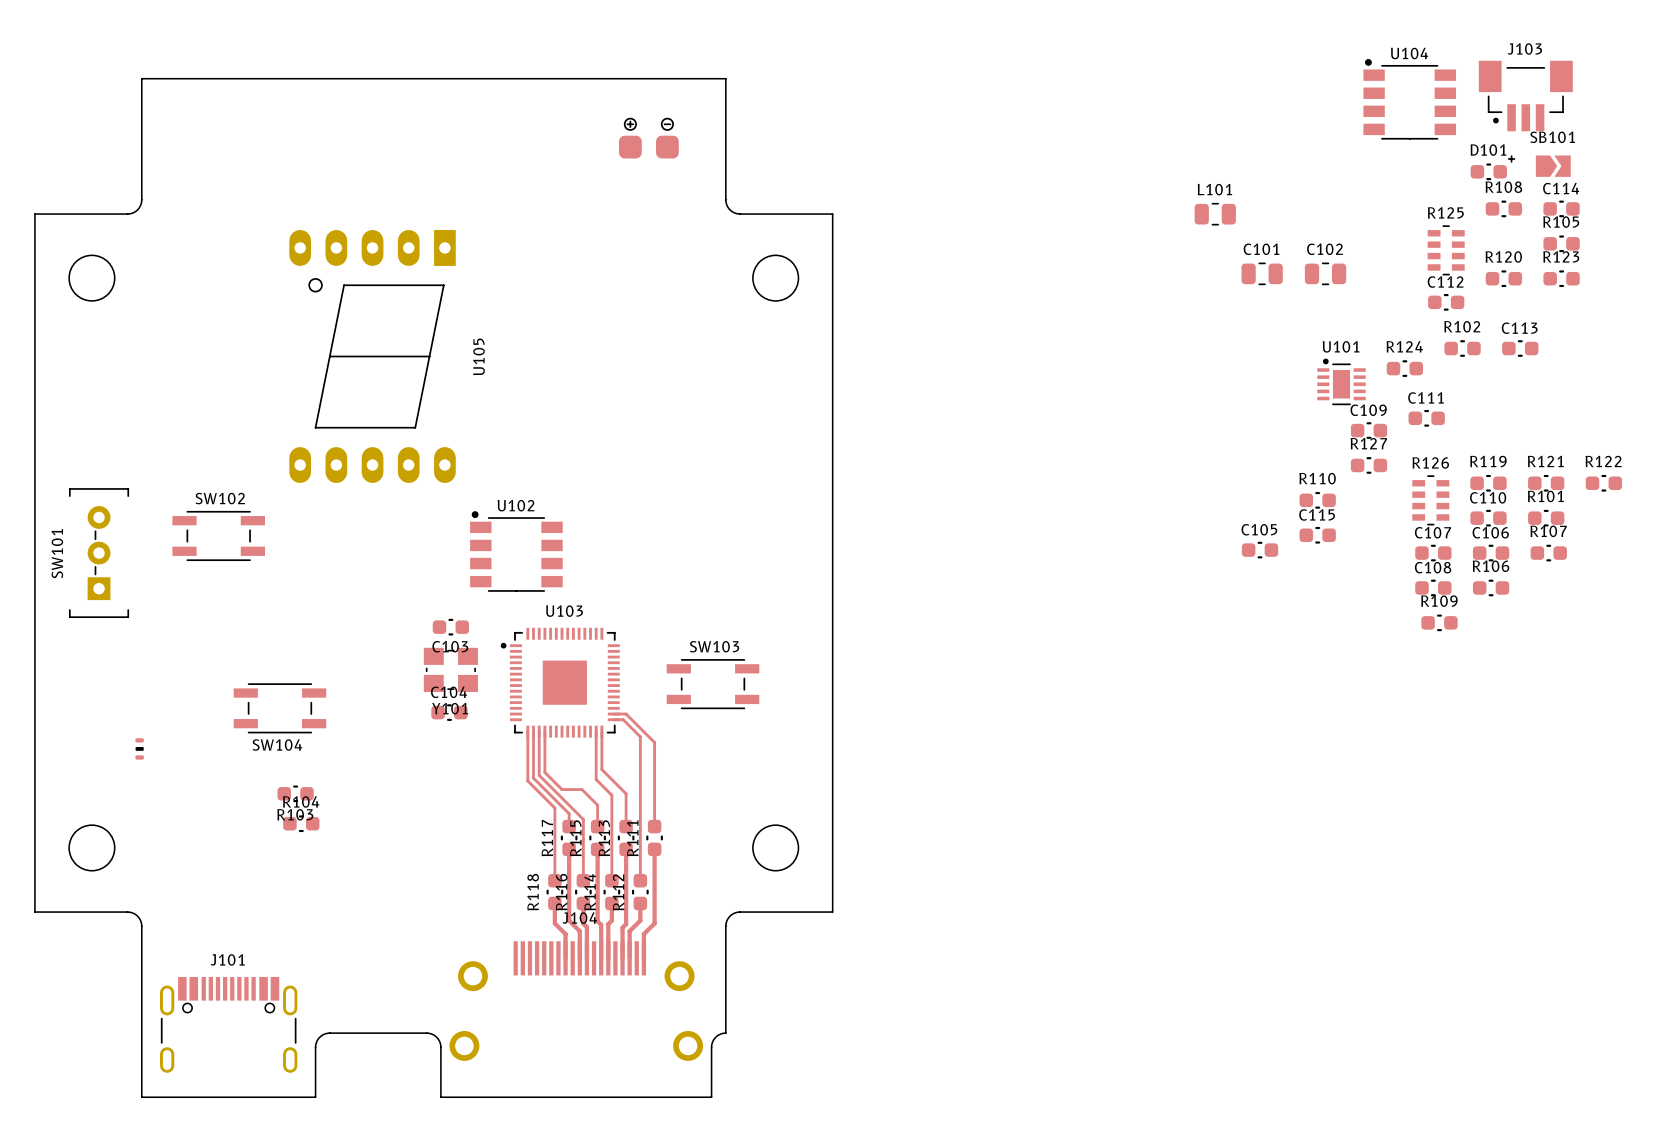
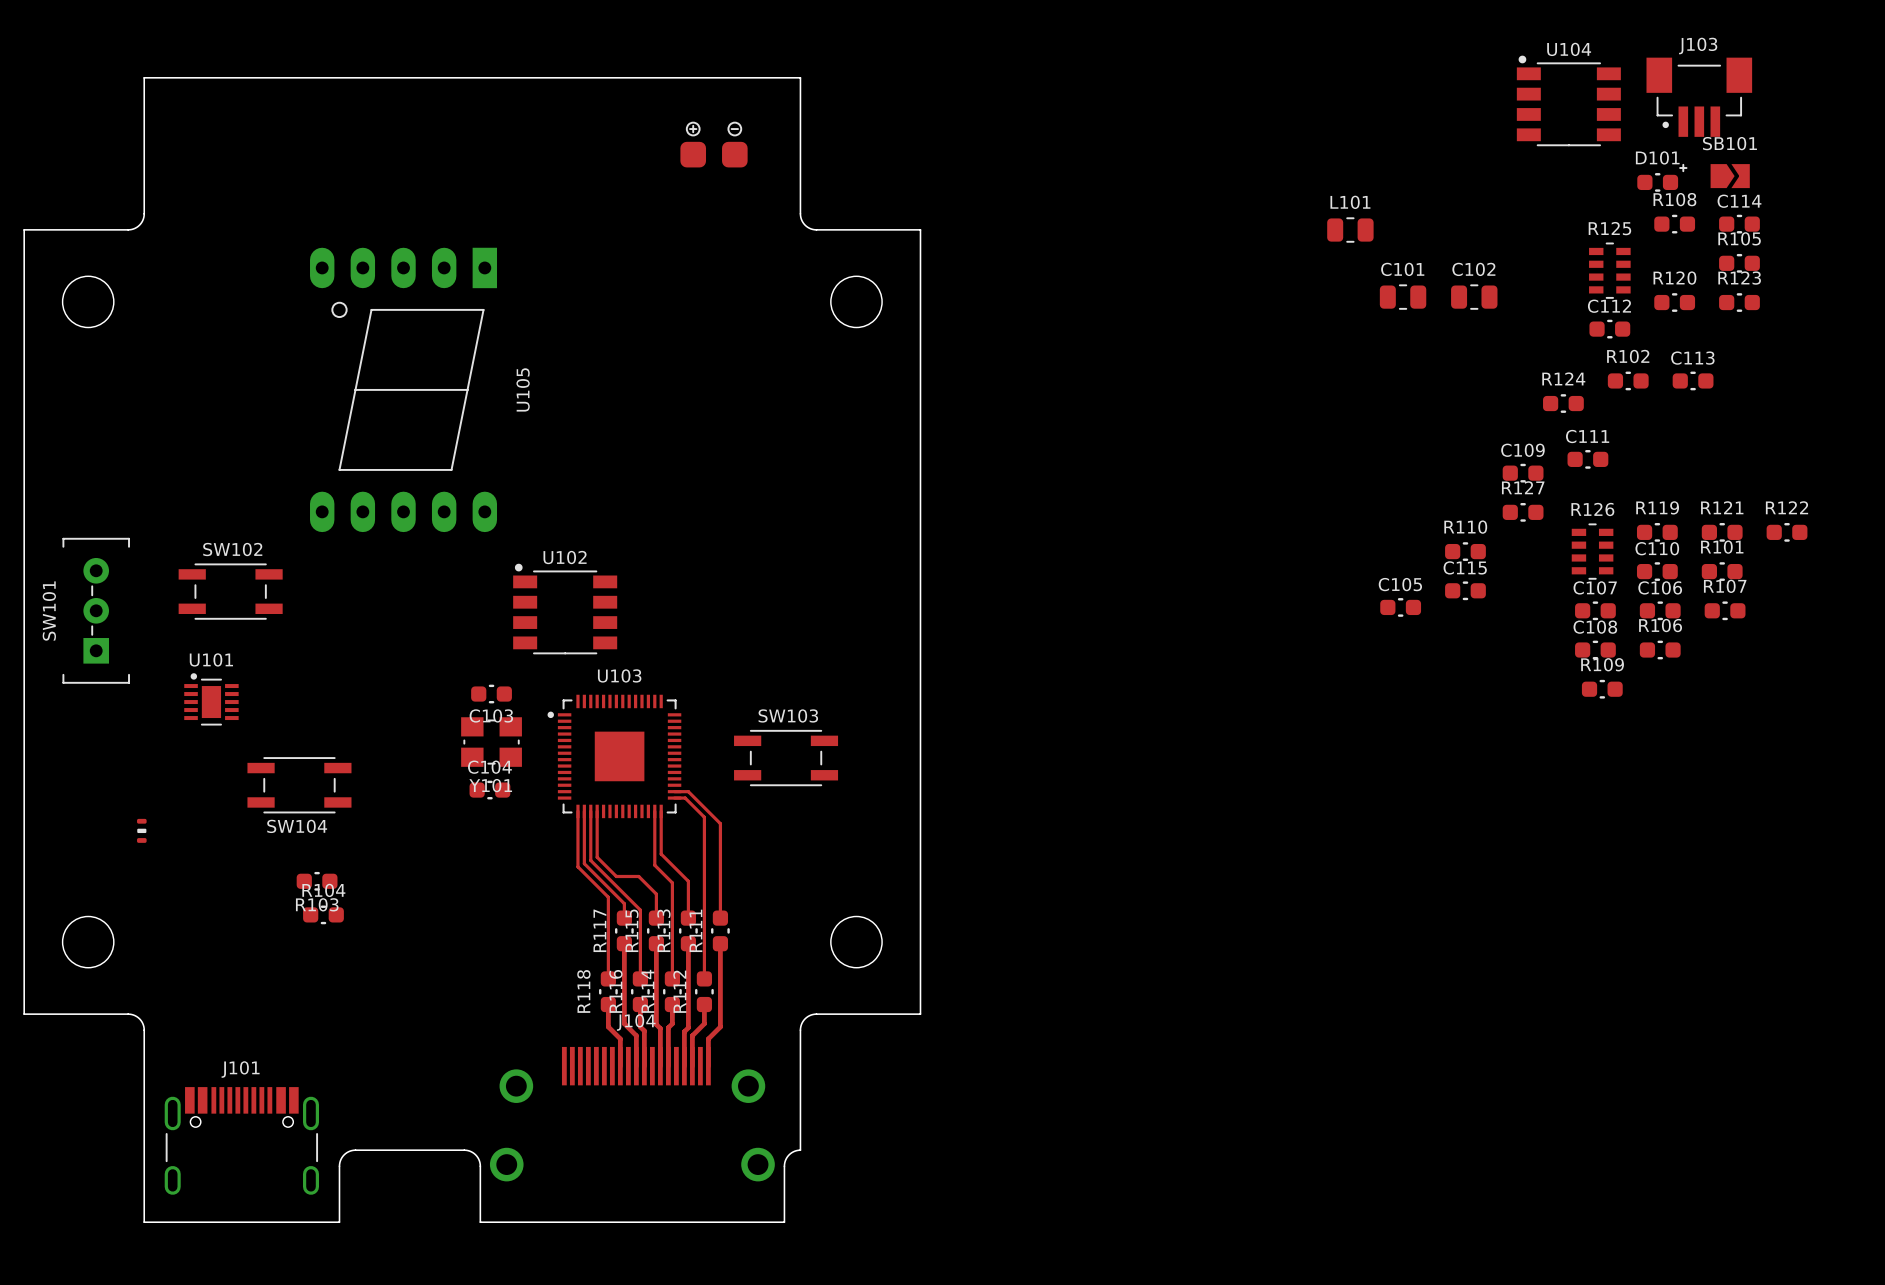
U101 position: (1341, 381) -> (211, 699)

